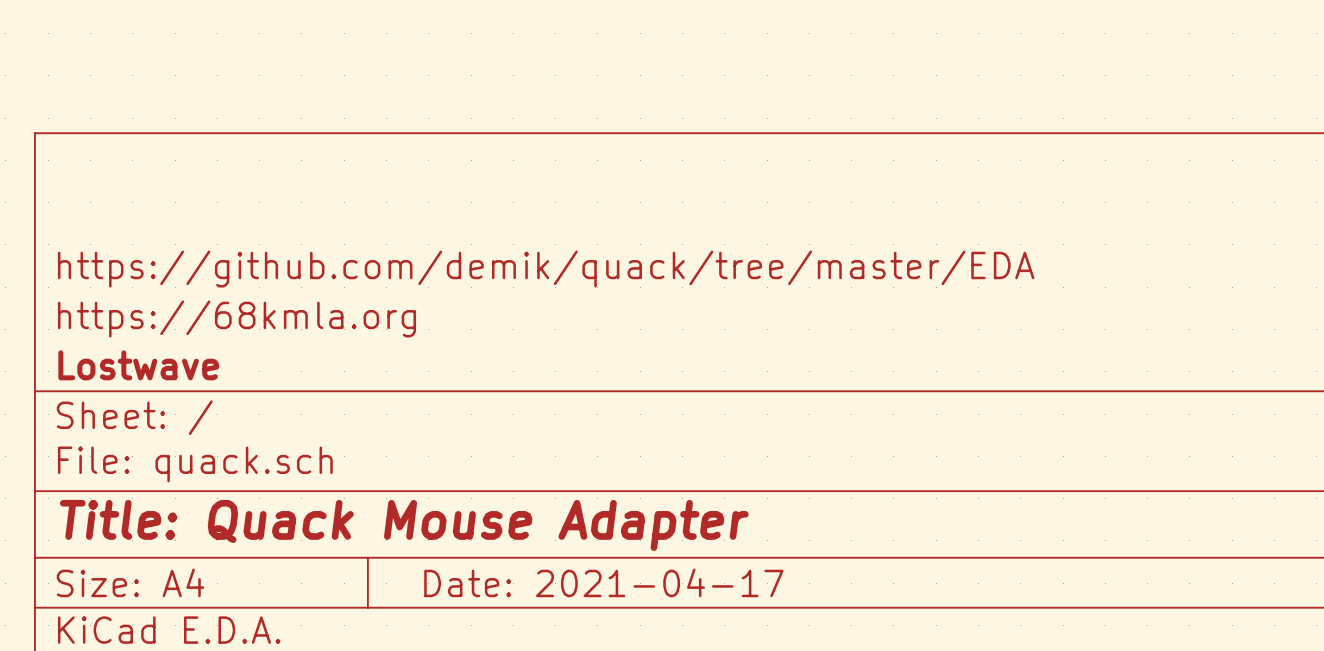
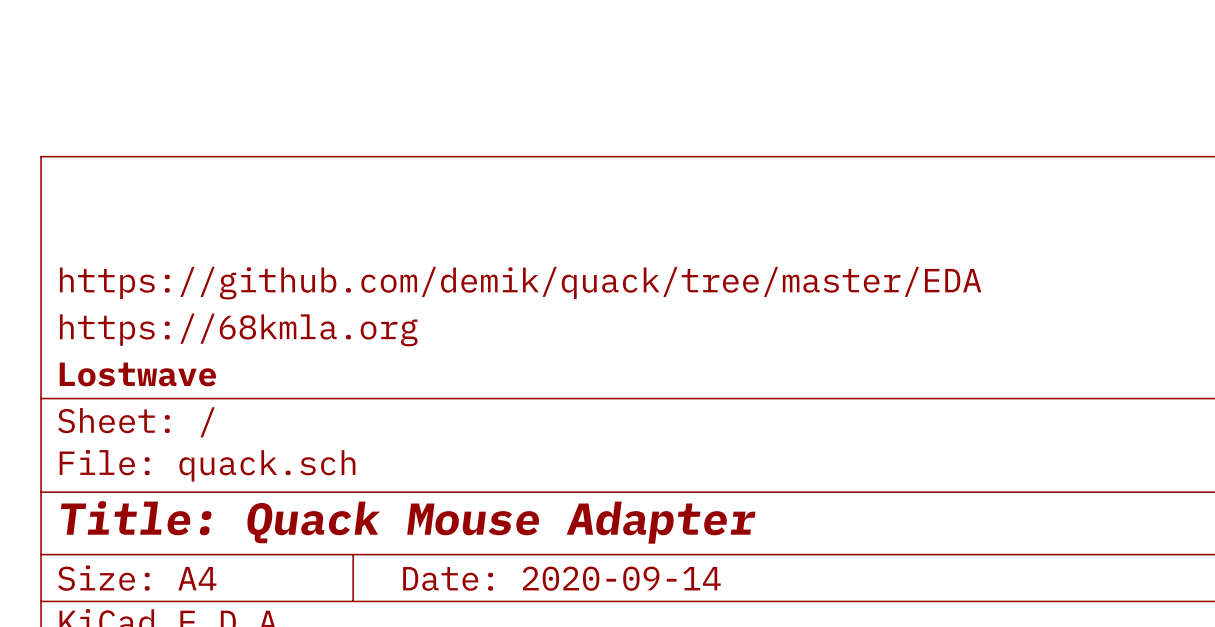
title block: Date: 2021-04-17 (603, 582) -> Date: 2020-09-14 (561, 578)

